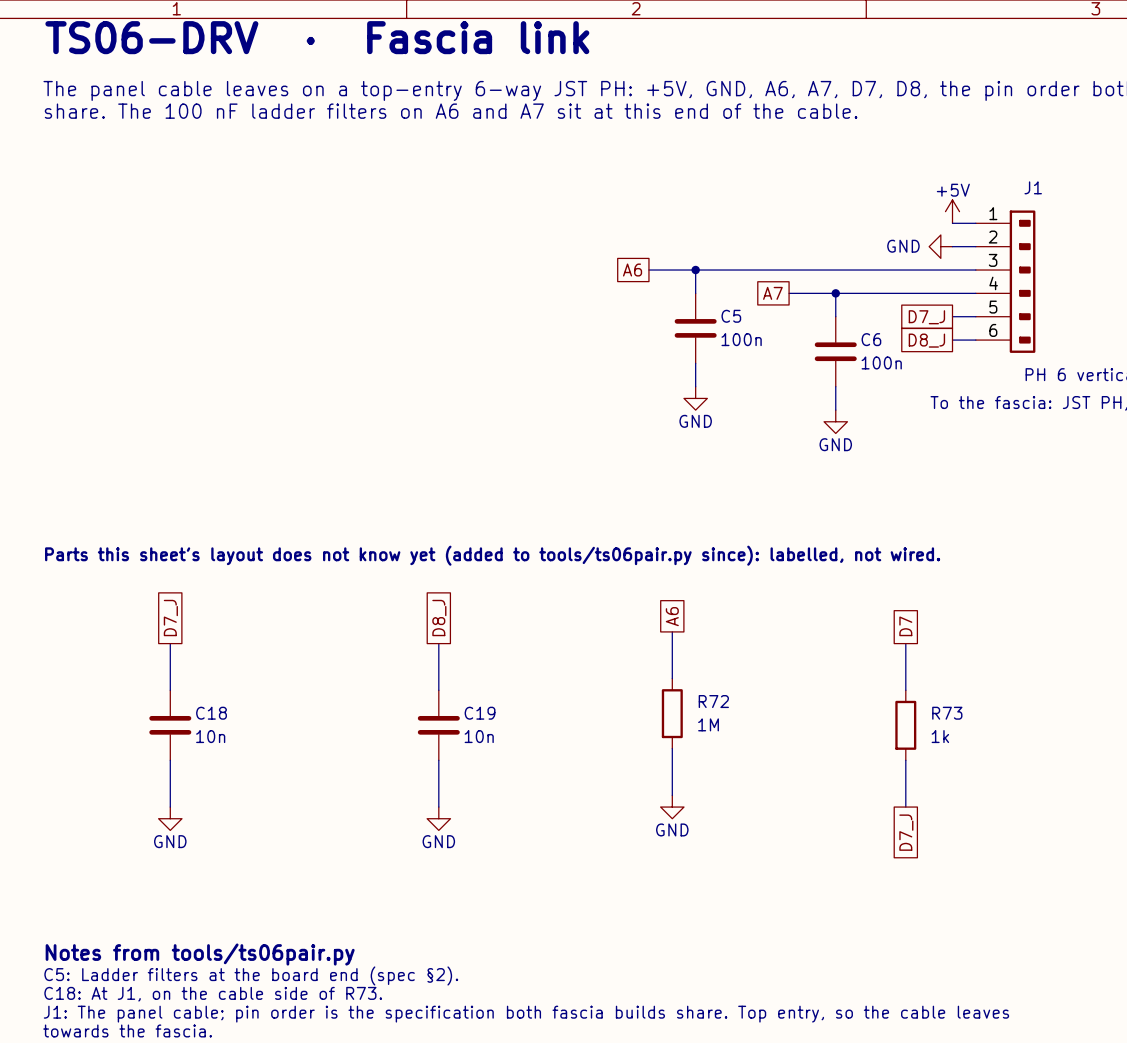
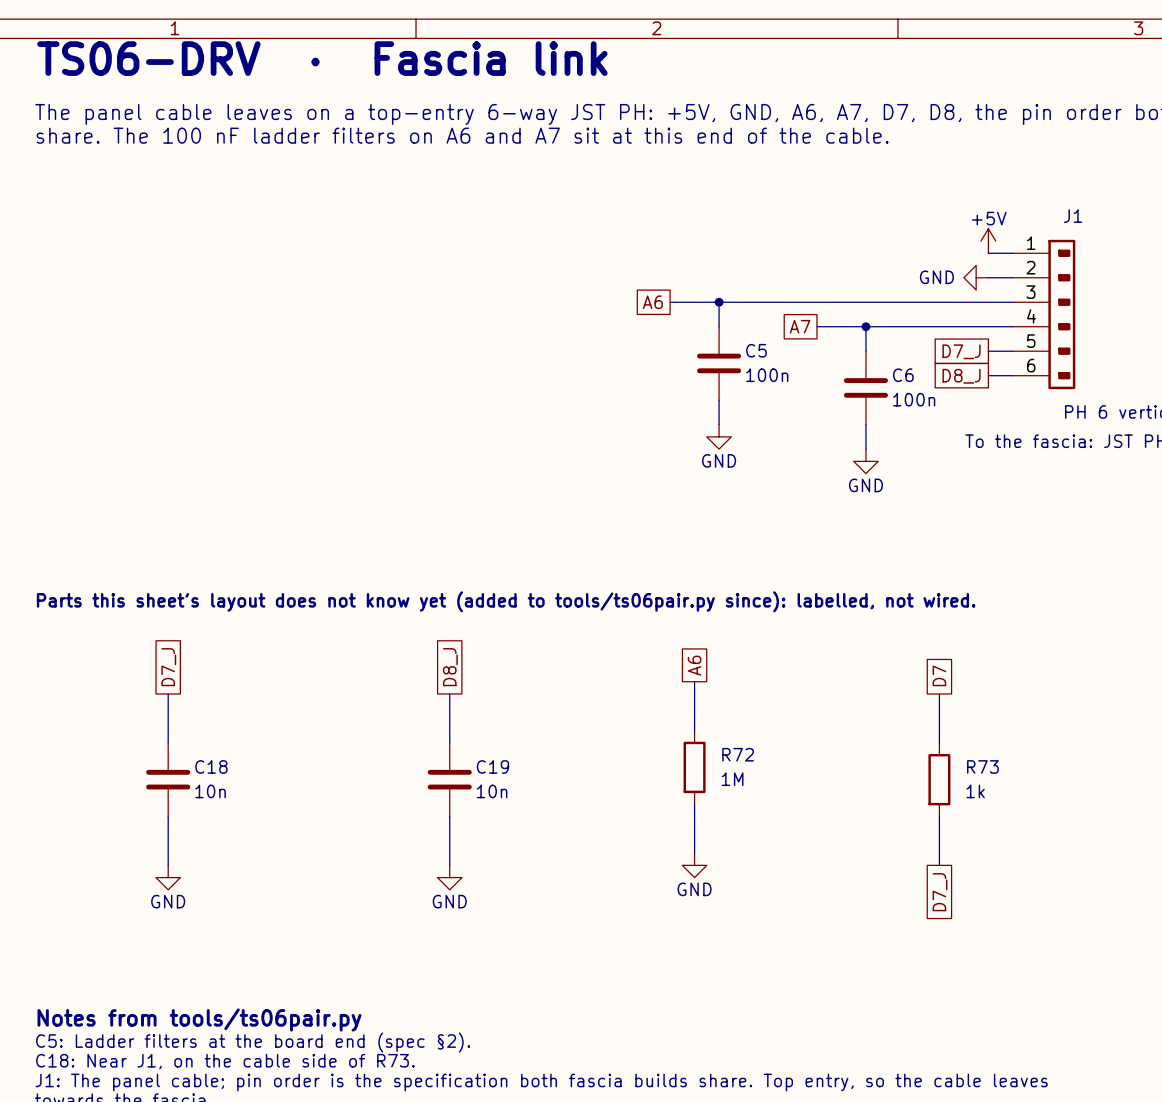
text: C18: At J1, on the cable side of R73. (213, 994) -> C18: Near J1, on the cable side of R73. (225, 1061)

